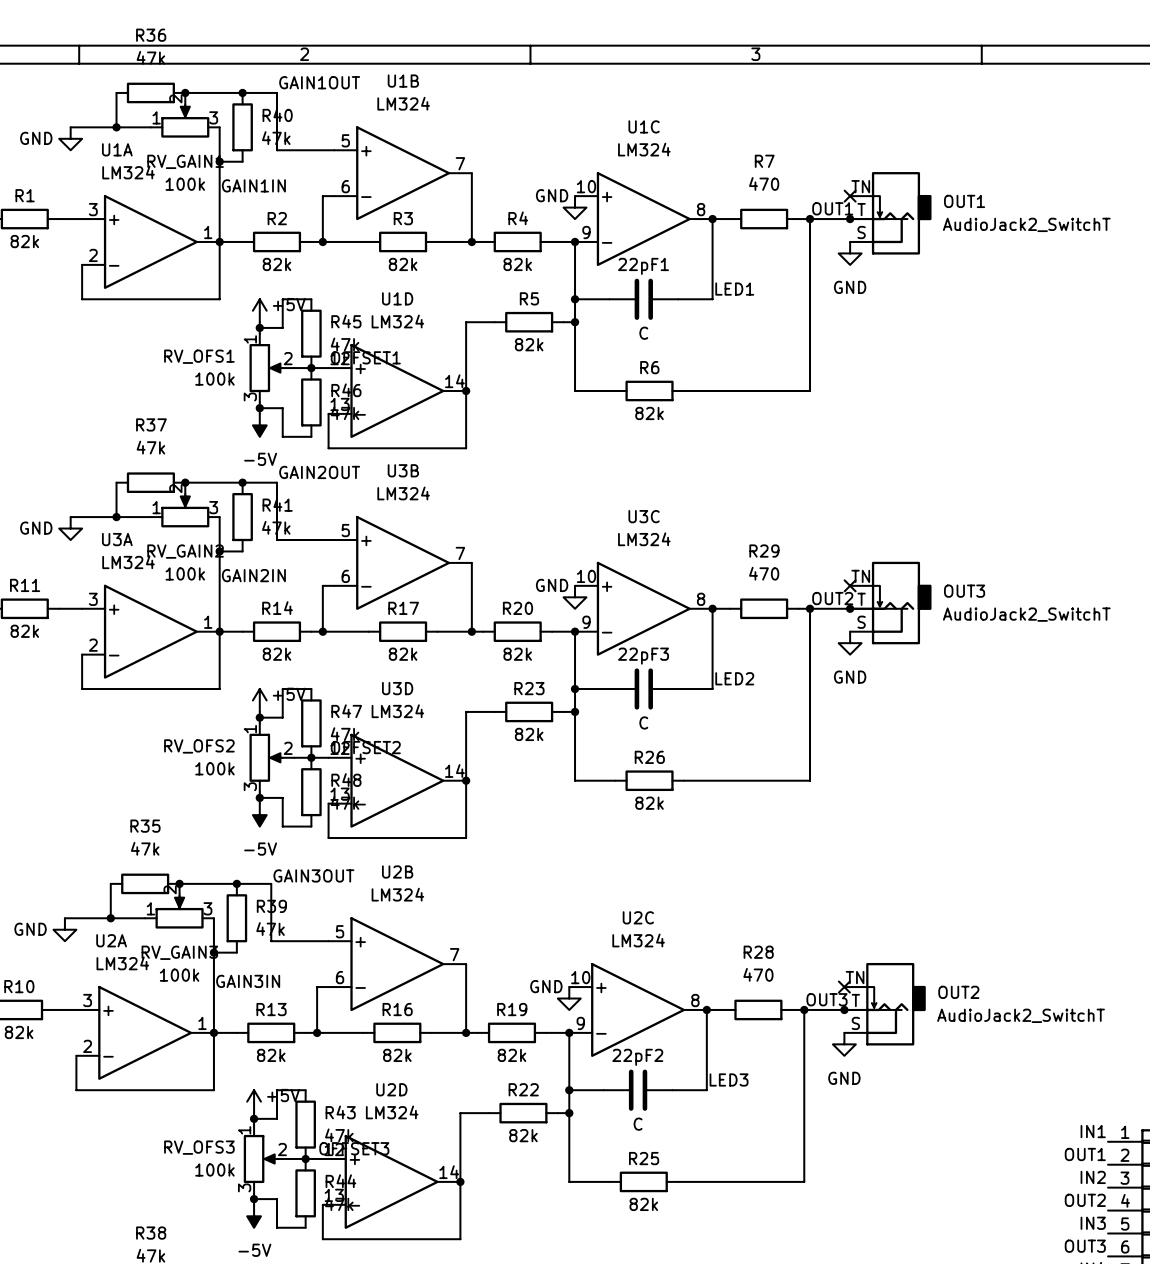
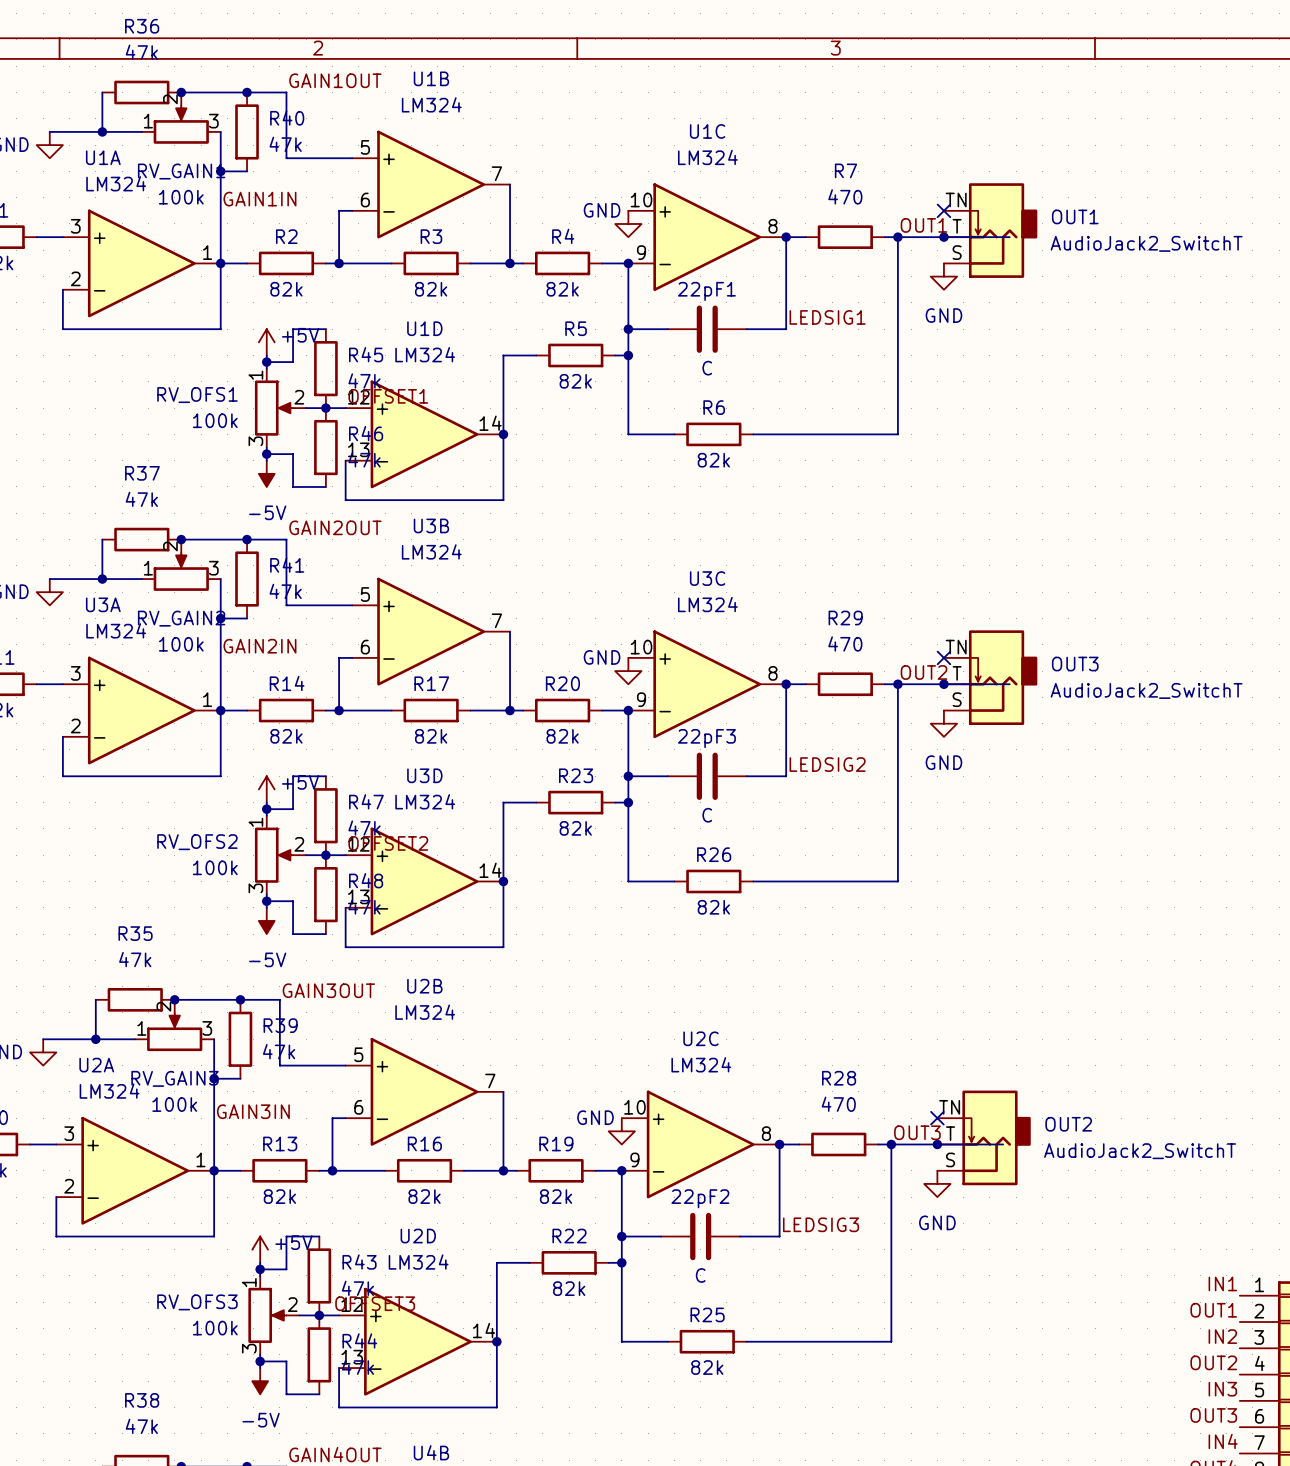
label: LED1 (734, 289) -> LEDSIG1 (827, 317)
label: LED2 (734, 678) -> LEDSIG2 (827, 764)
label: LED3 (729, 1079) -> LEDSIG3 (821, 1224)

